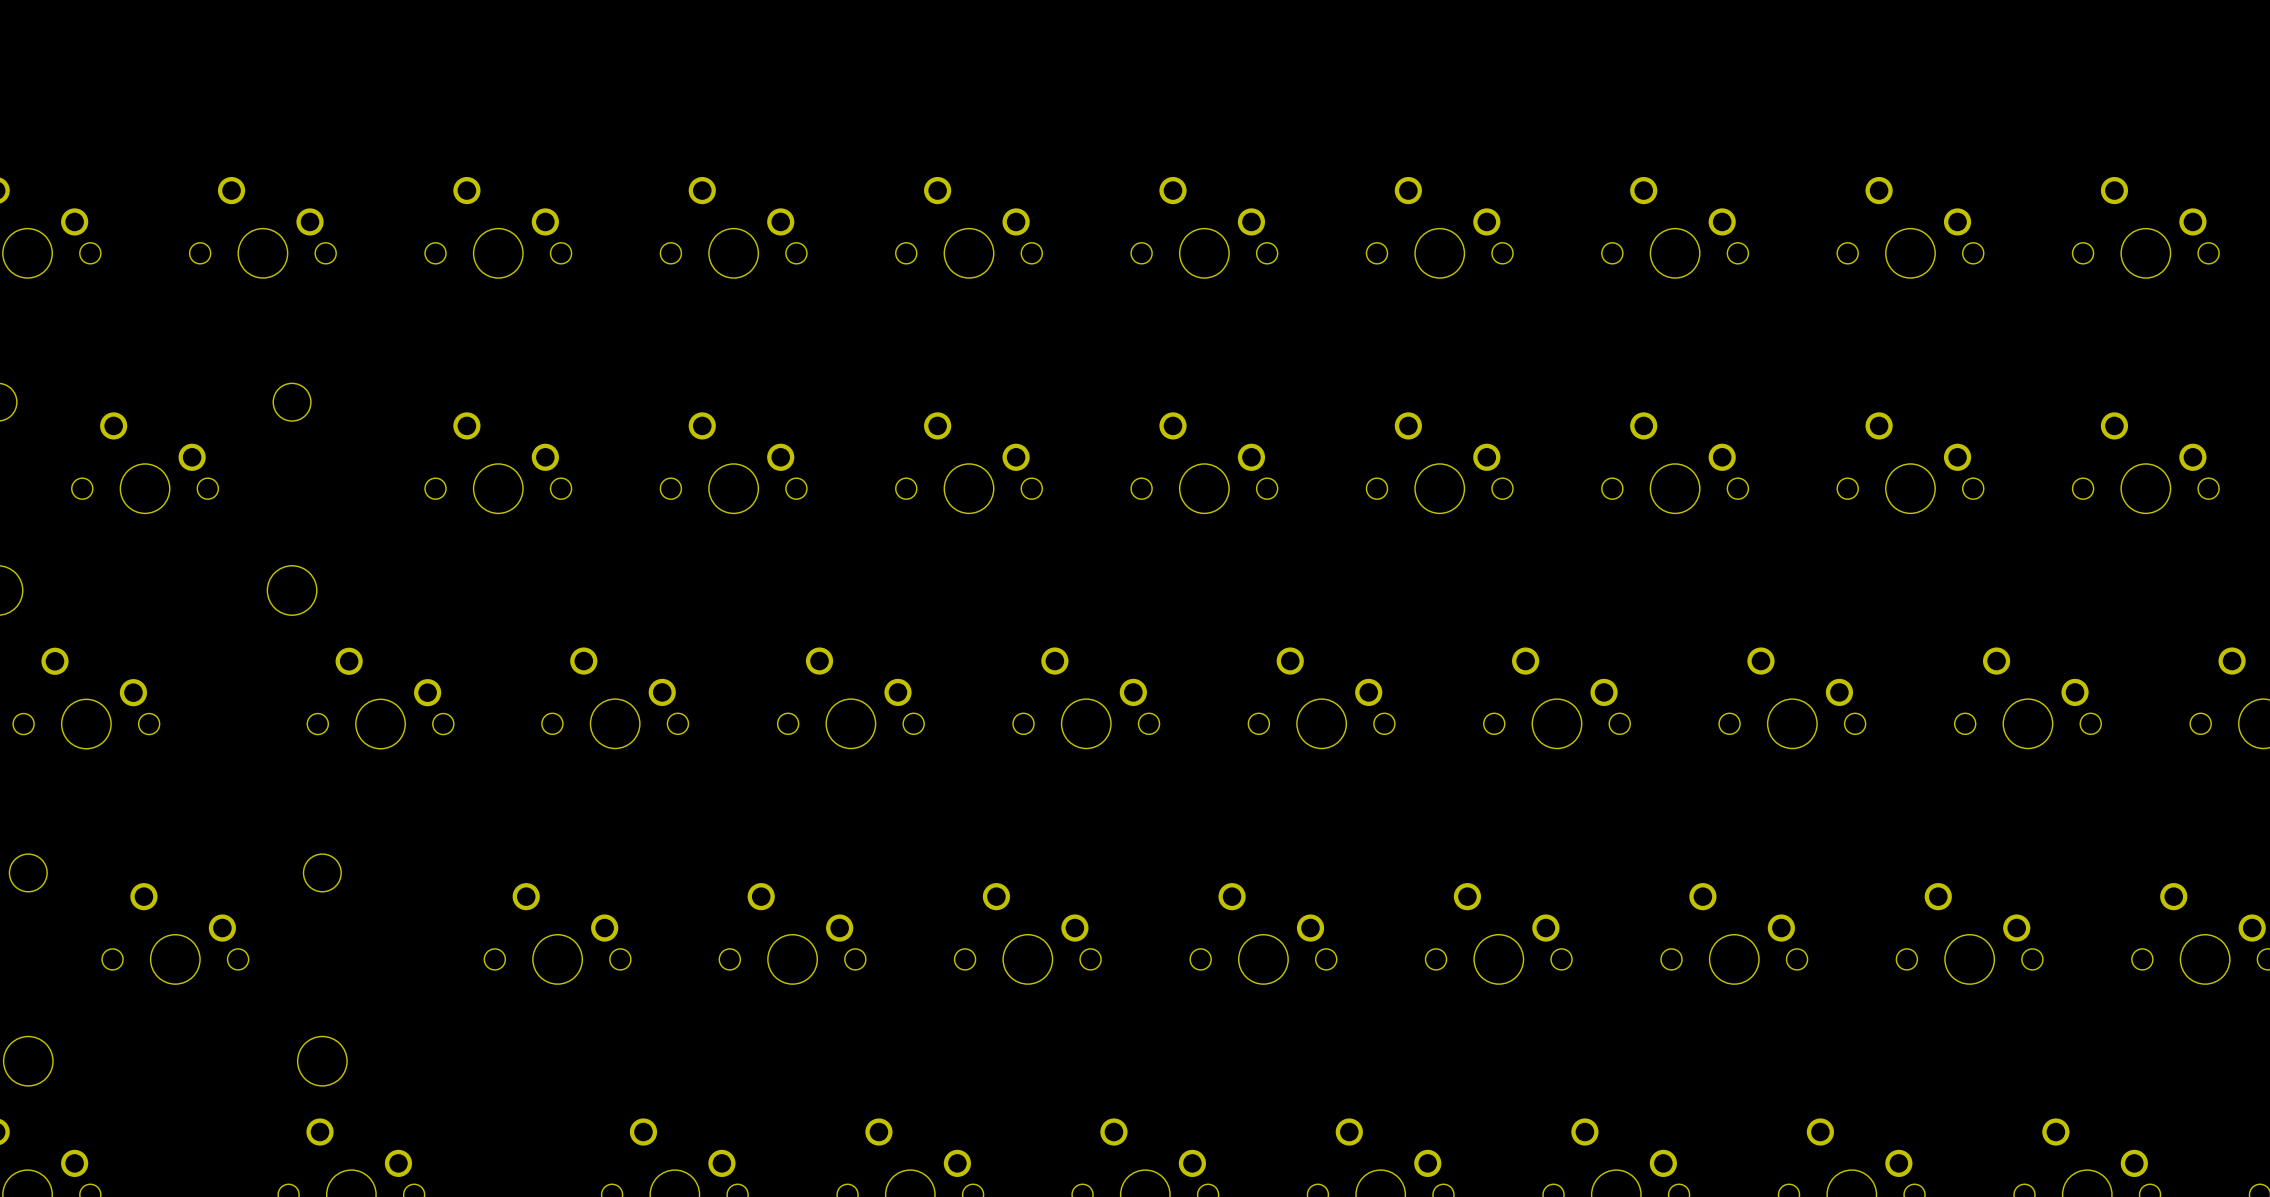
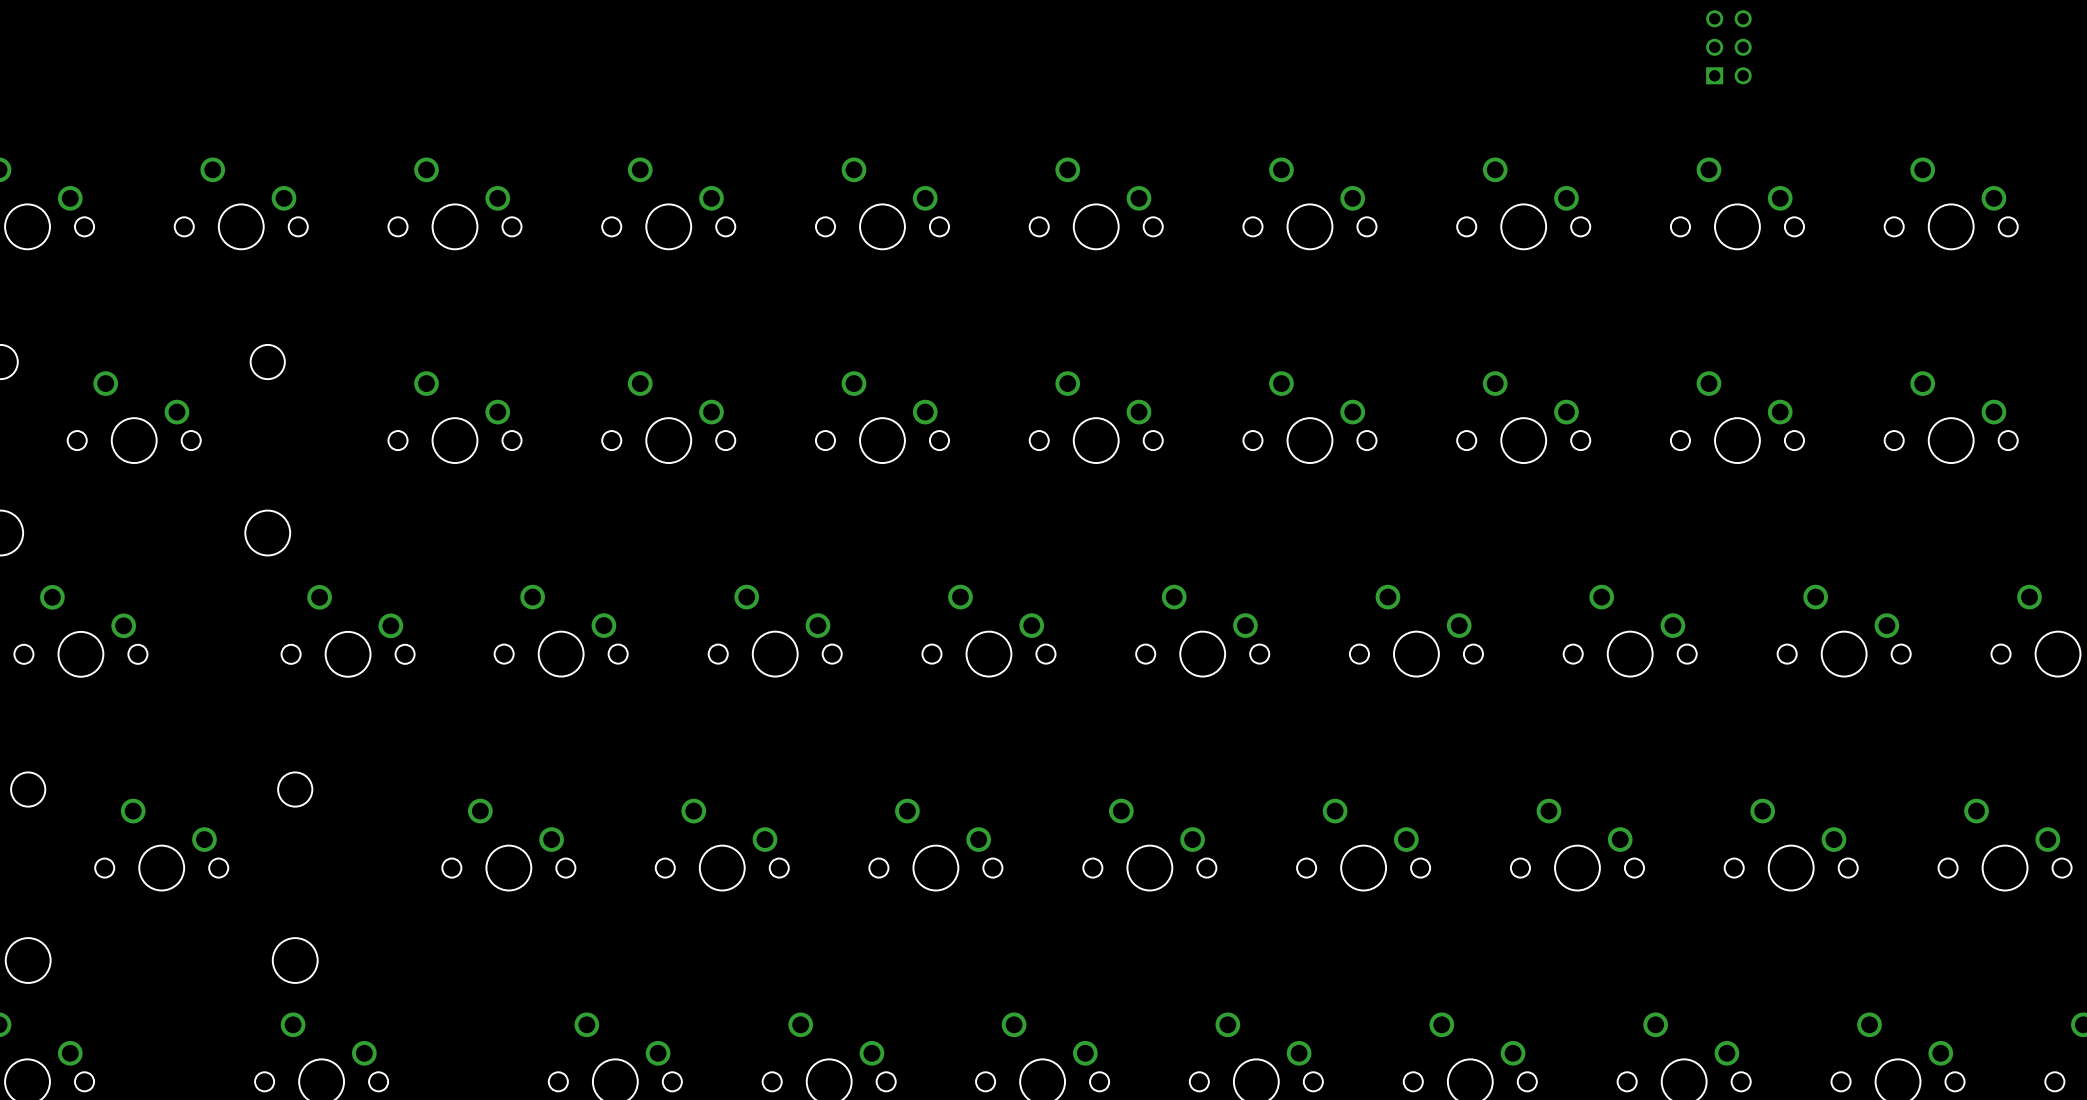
part: none -> (1728, 47)

